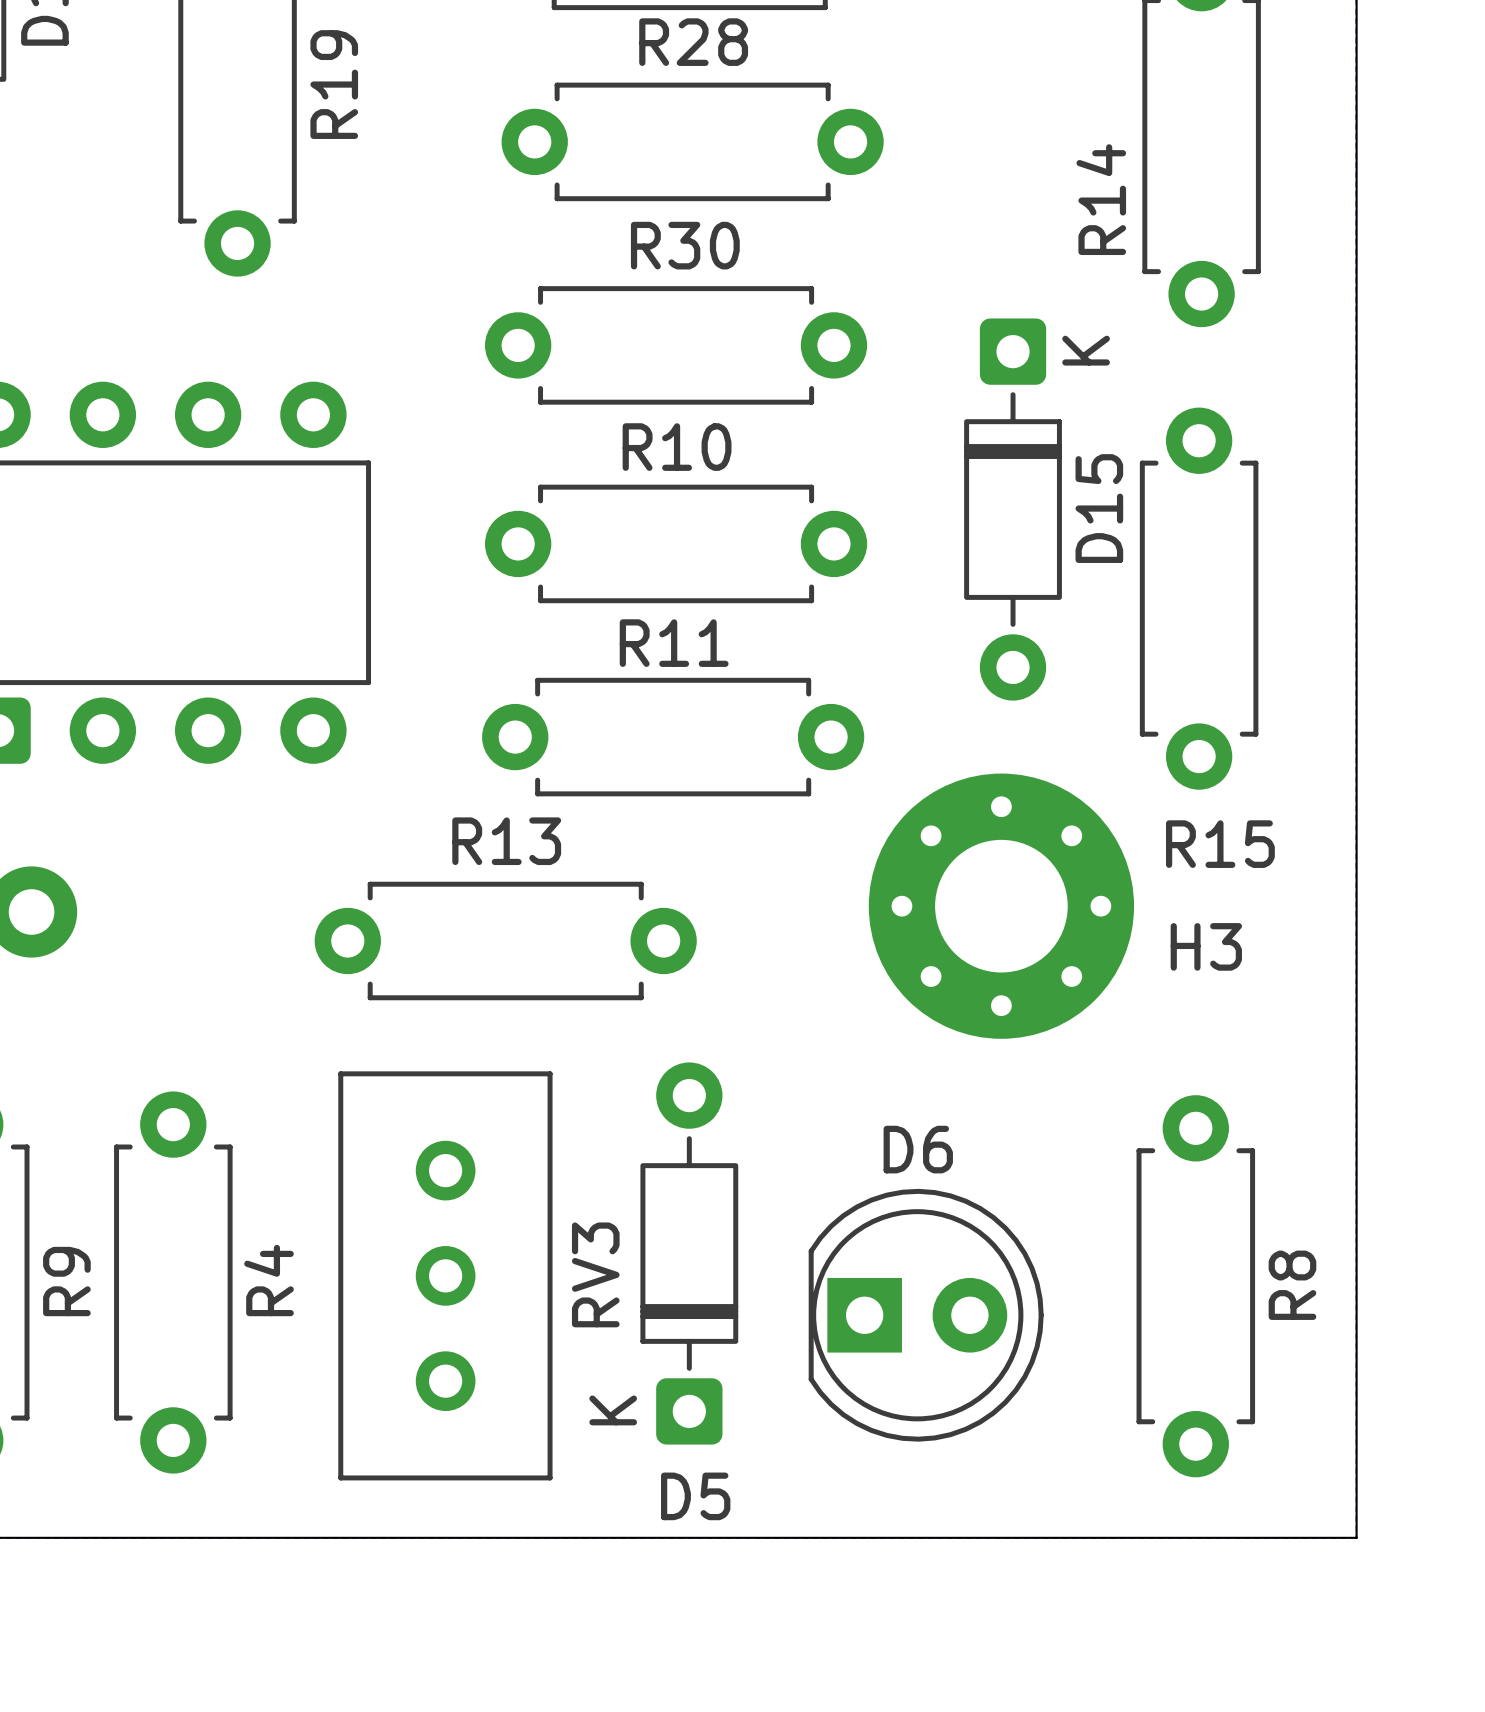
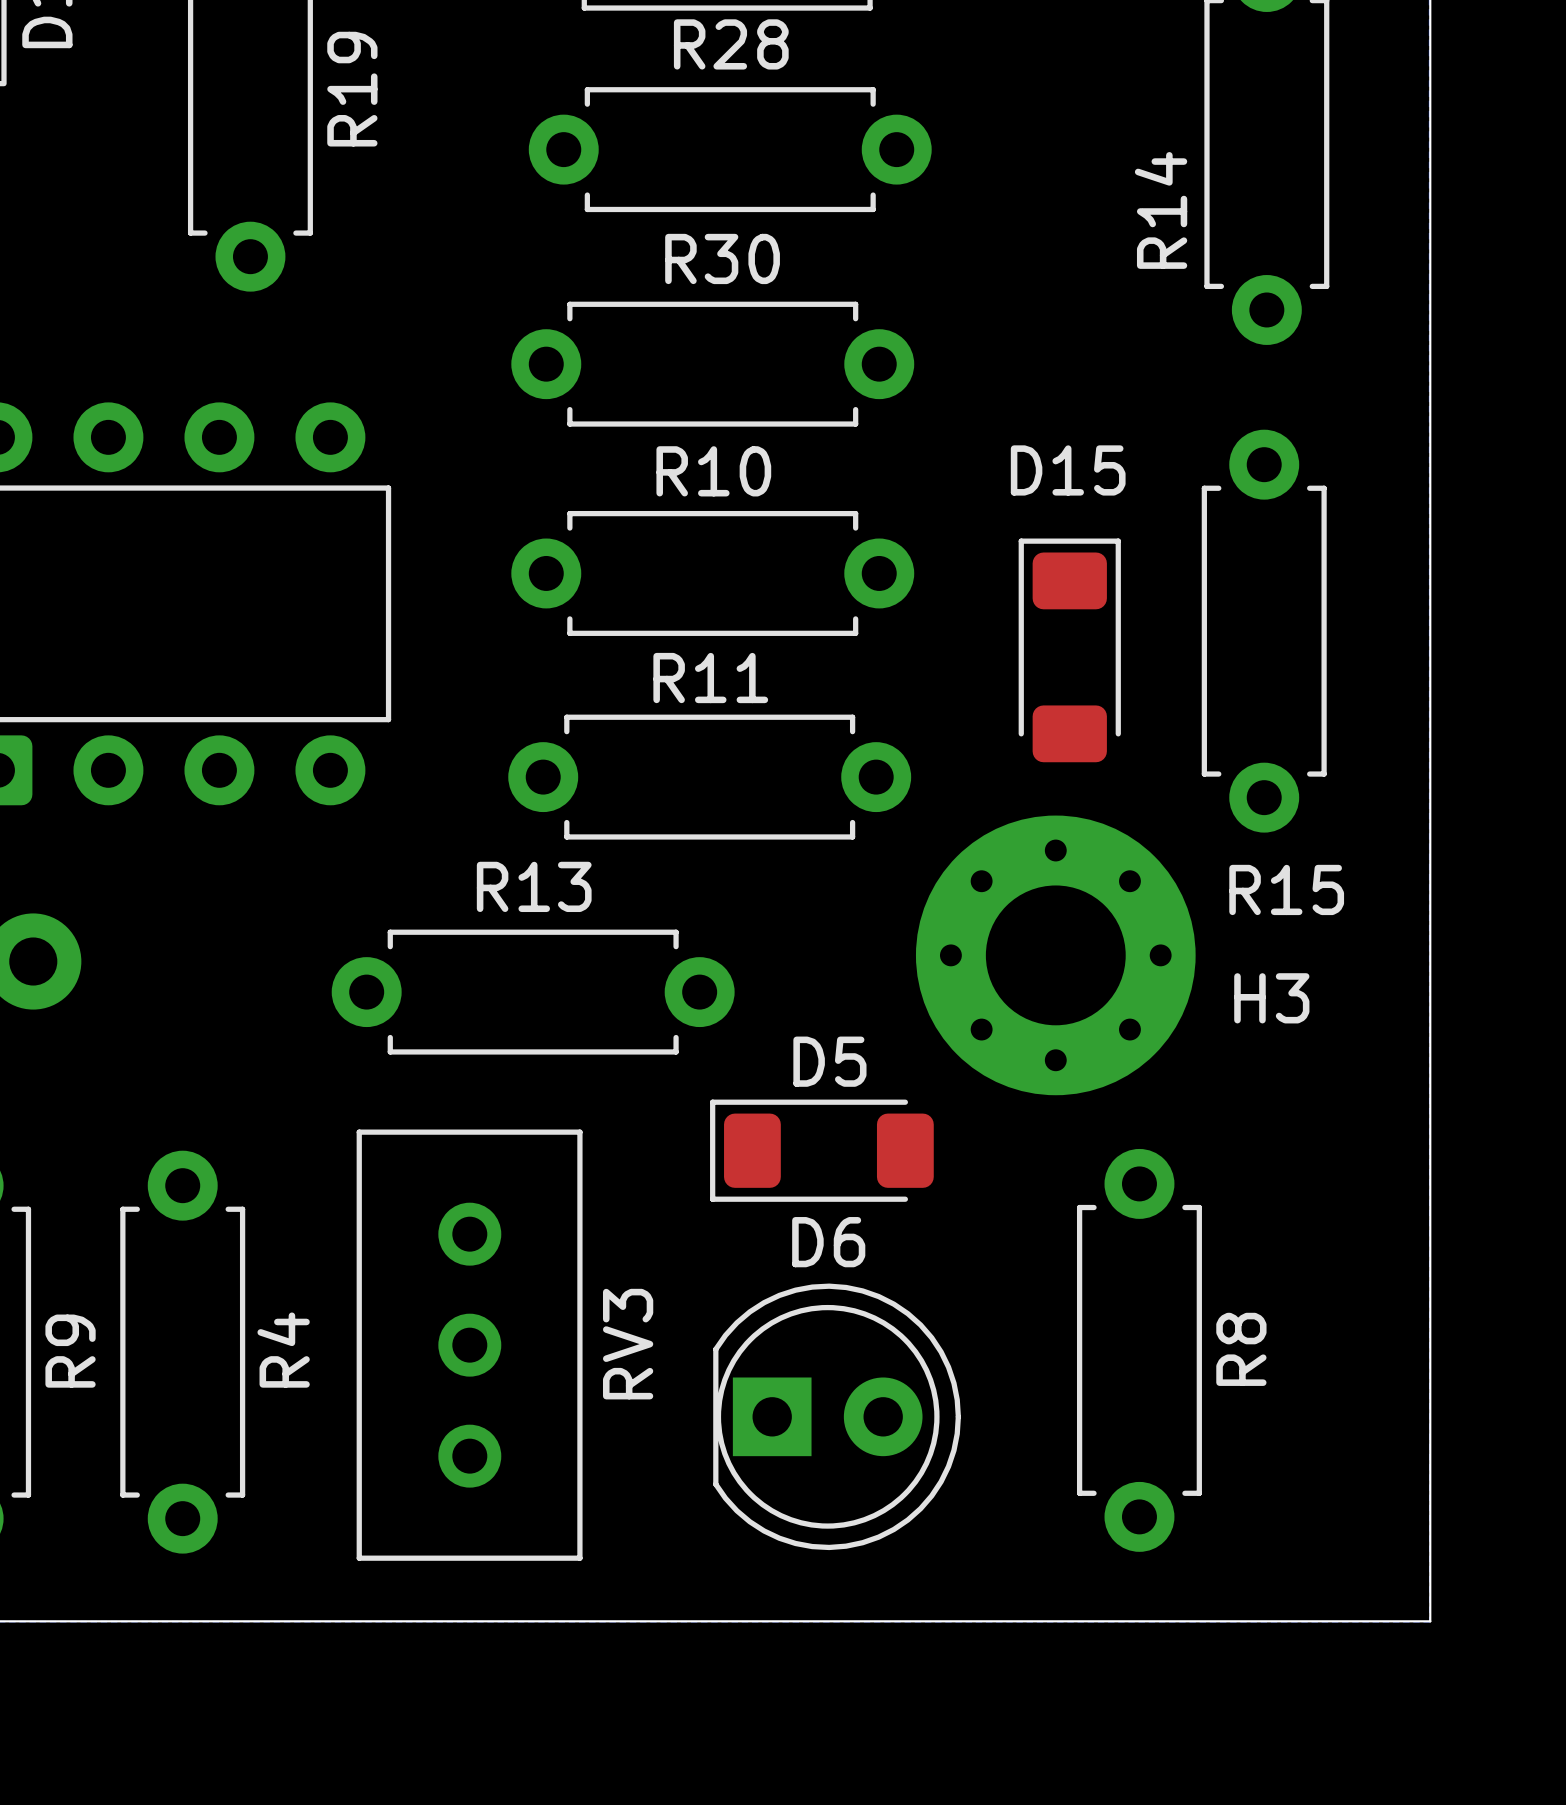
D15 footprint: [964, 318, 1062, 701] -> [1018, 538, 1121, 763]
D15 name position: D15 (1099, 508) -> D15 (1068, 470)
D5 footprint: [640, 1062, 739, 1445] -> [710, 1099, 934, 1202]
R8 position: (1195, 1286) -> (1139, 1350)
D6 position: (926, 1315) -> (837, 1416)
D5 name position: D5 (695, 1496) -> D5 (829, 1061)

